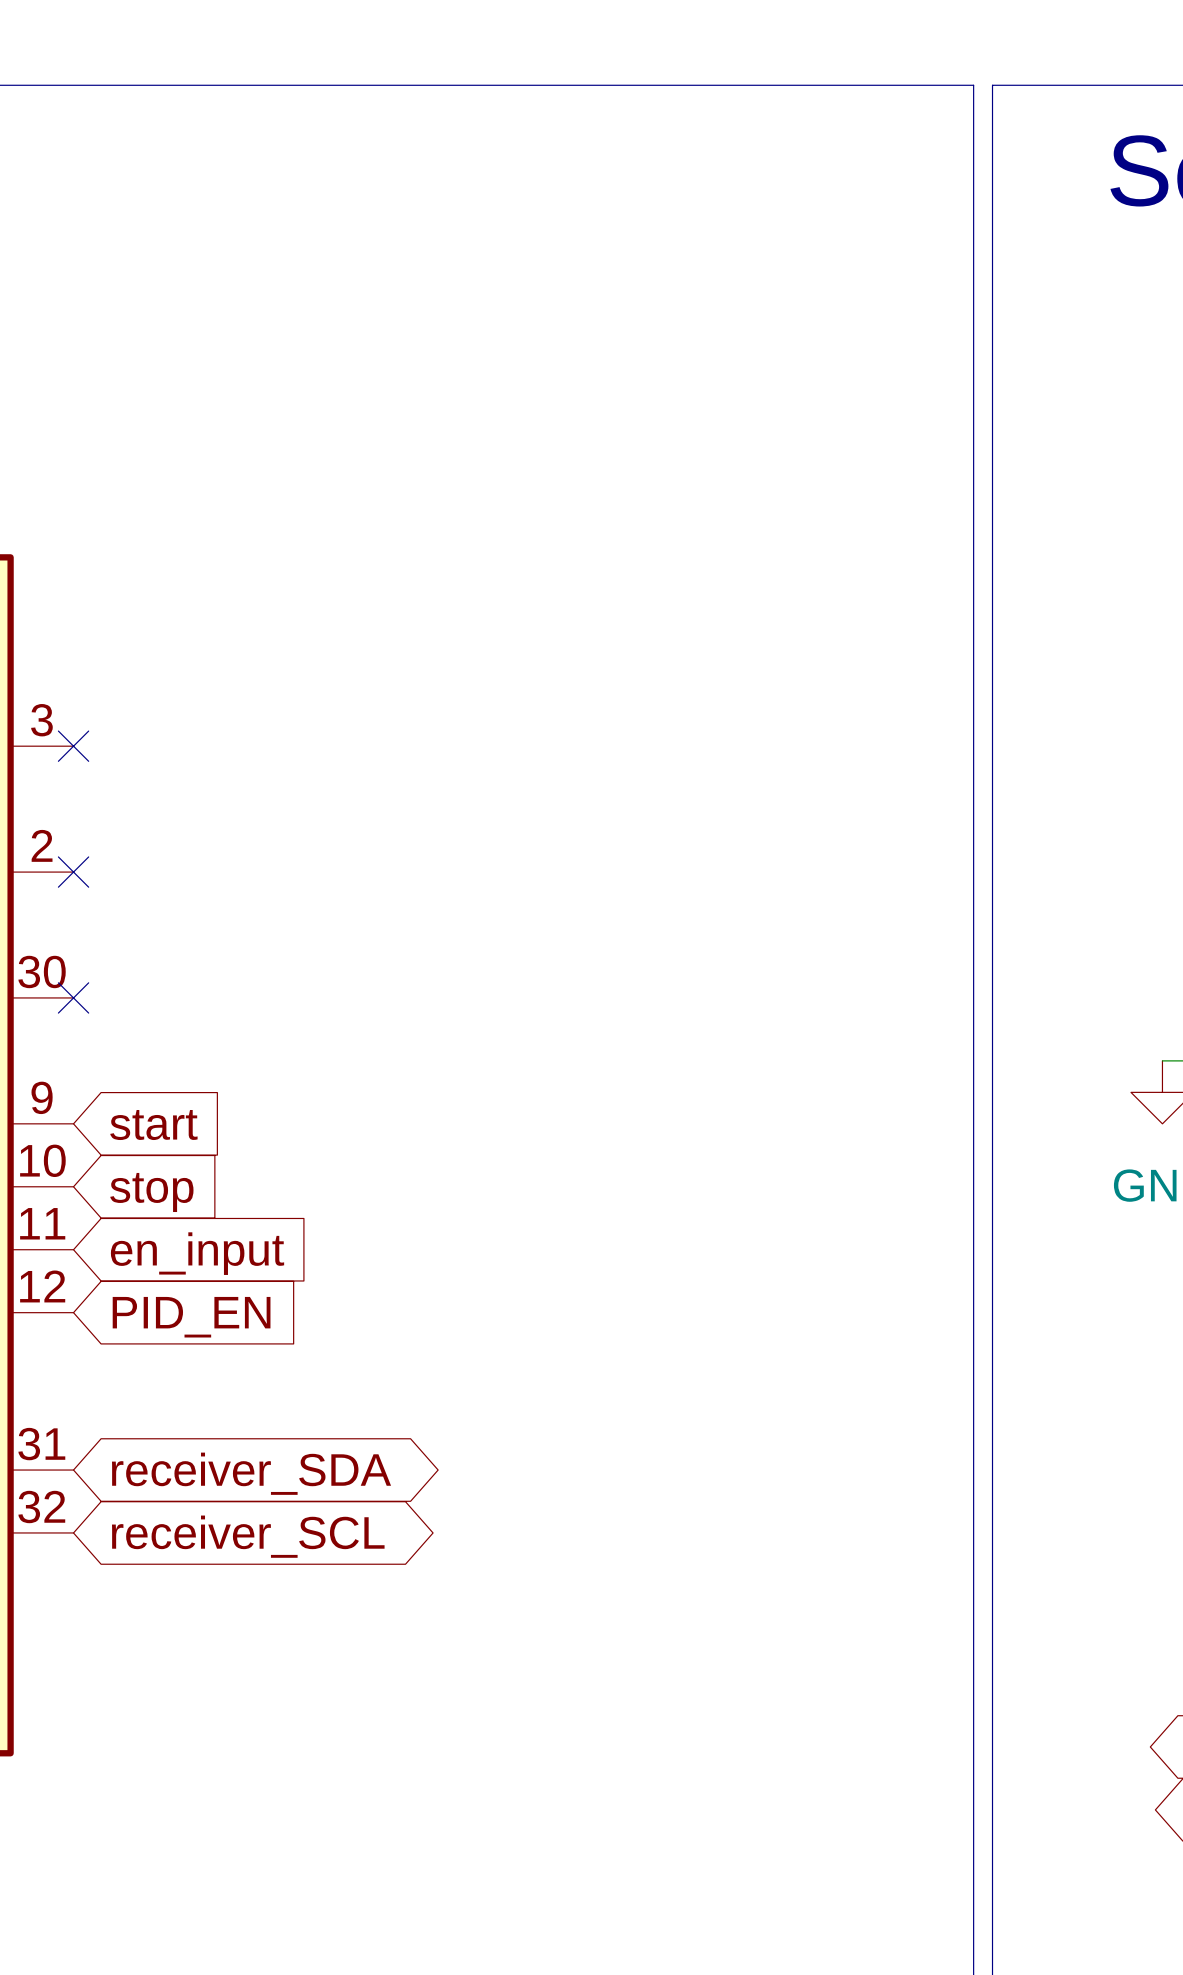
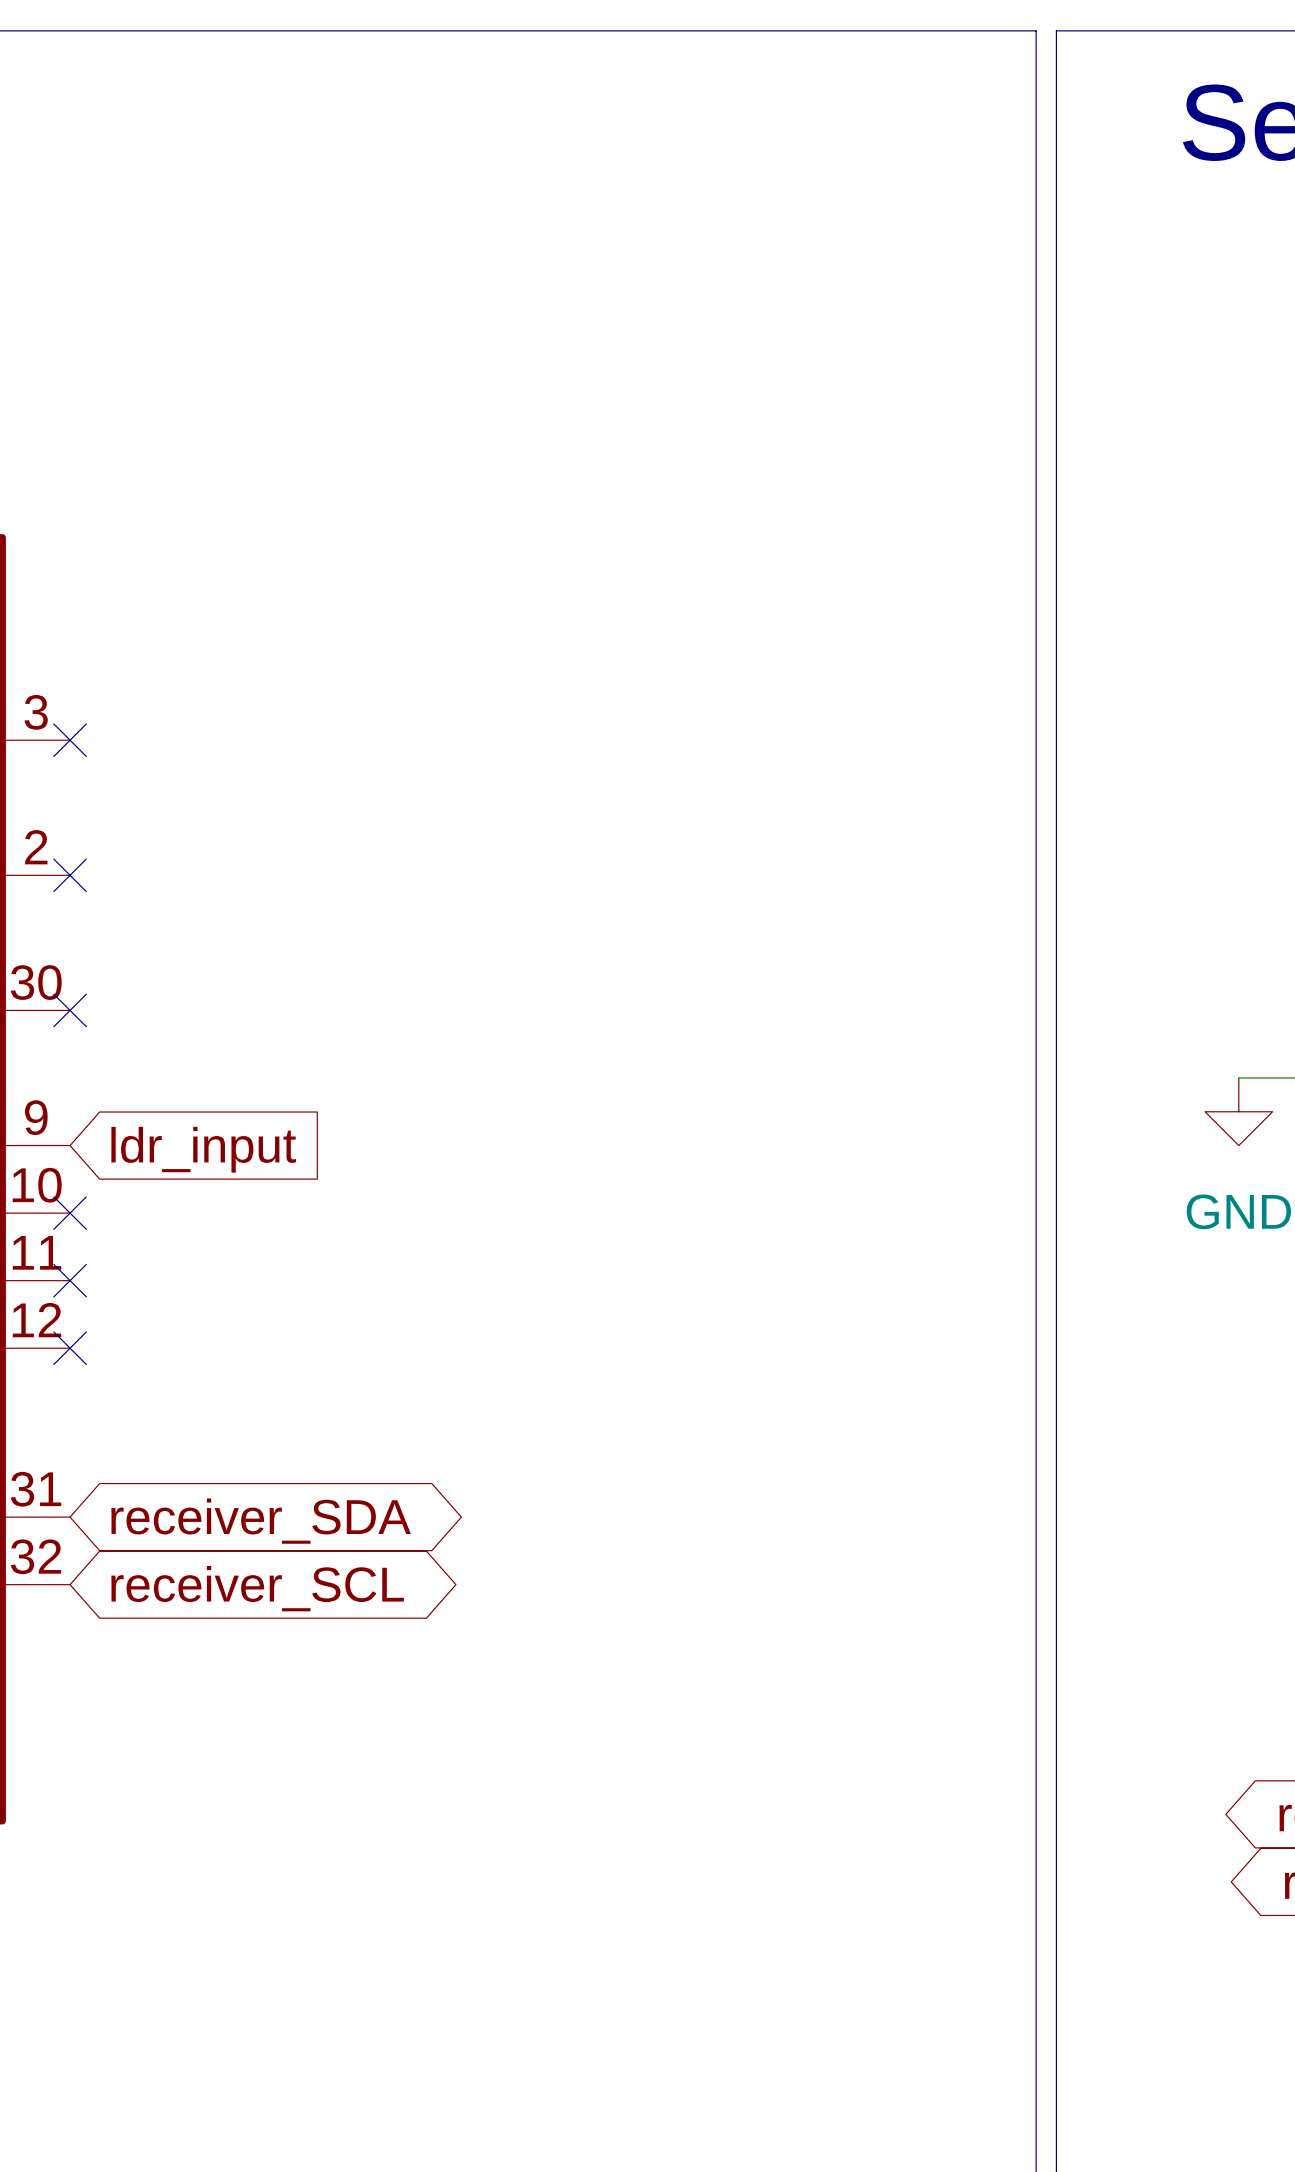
global label: start (153, 1125) -> ldr_input (203, 1149)
no-connect mark: none -> (70, 1213)
global label: stop (151, 1192) -> none
no-connect mark: none -> (70, 1280)
global label: en_input (197, 1253) -> none
no-connect mark: none -> (70, 1348)
global label: PID_EN (191, 1317) -> none

